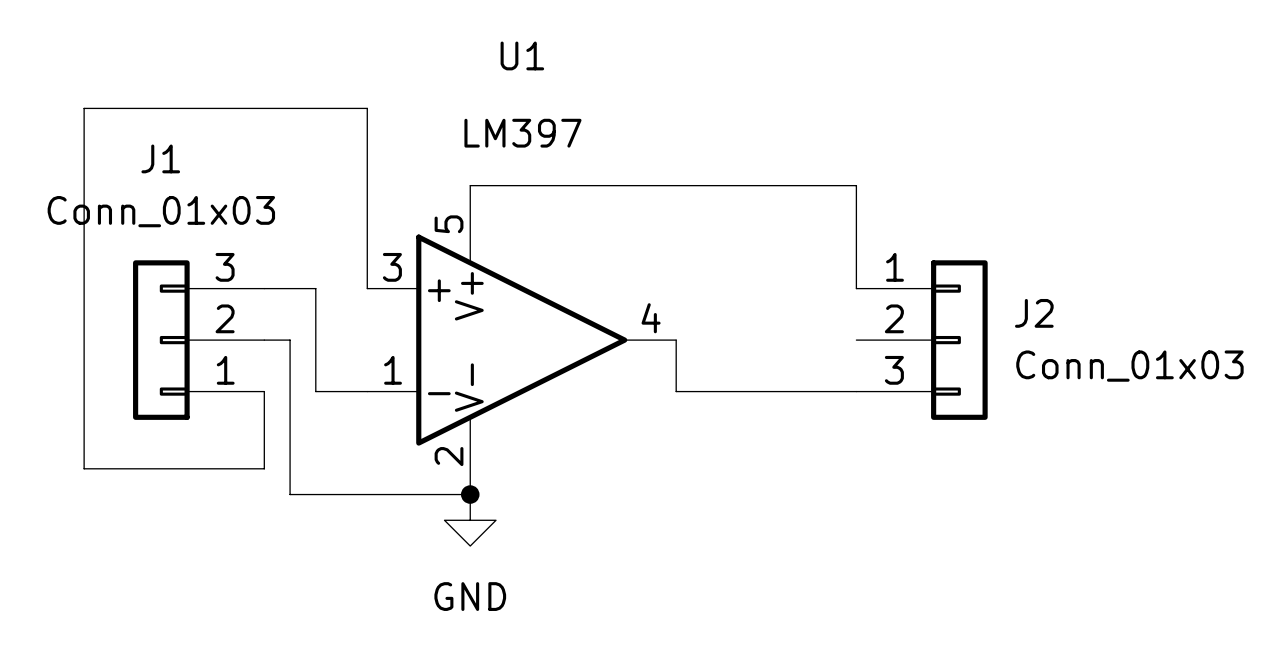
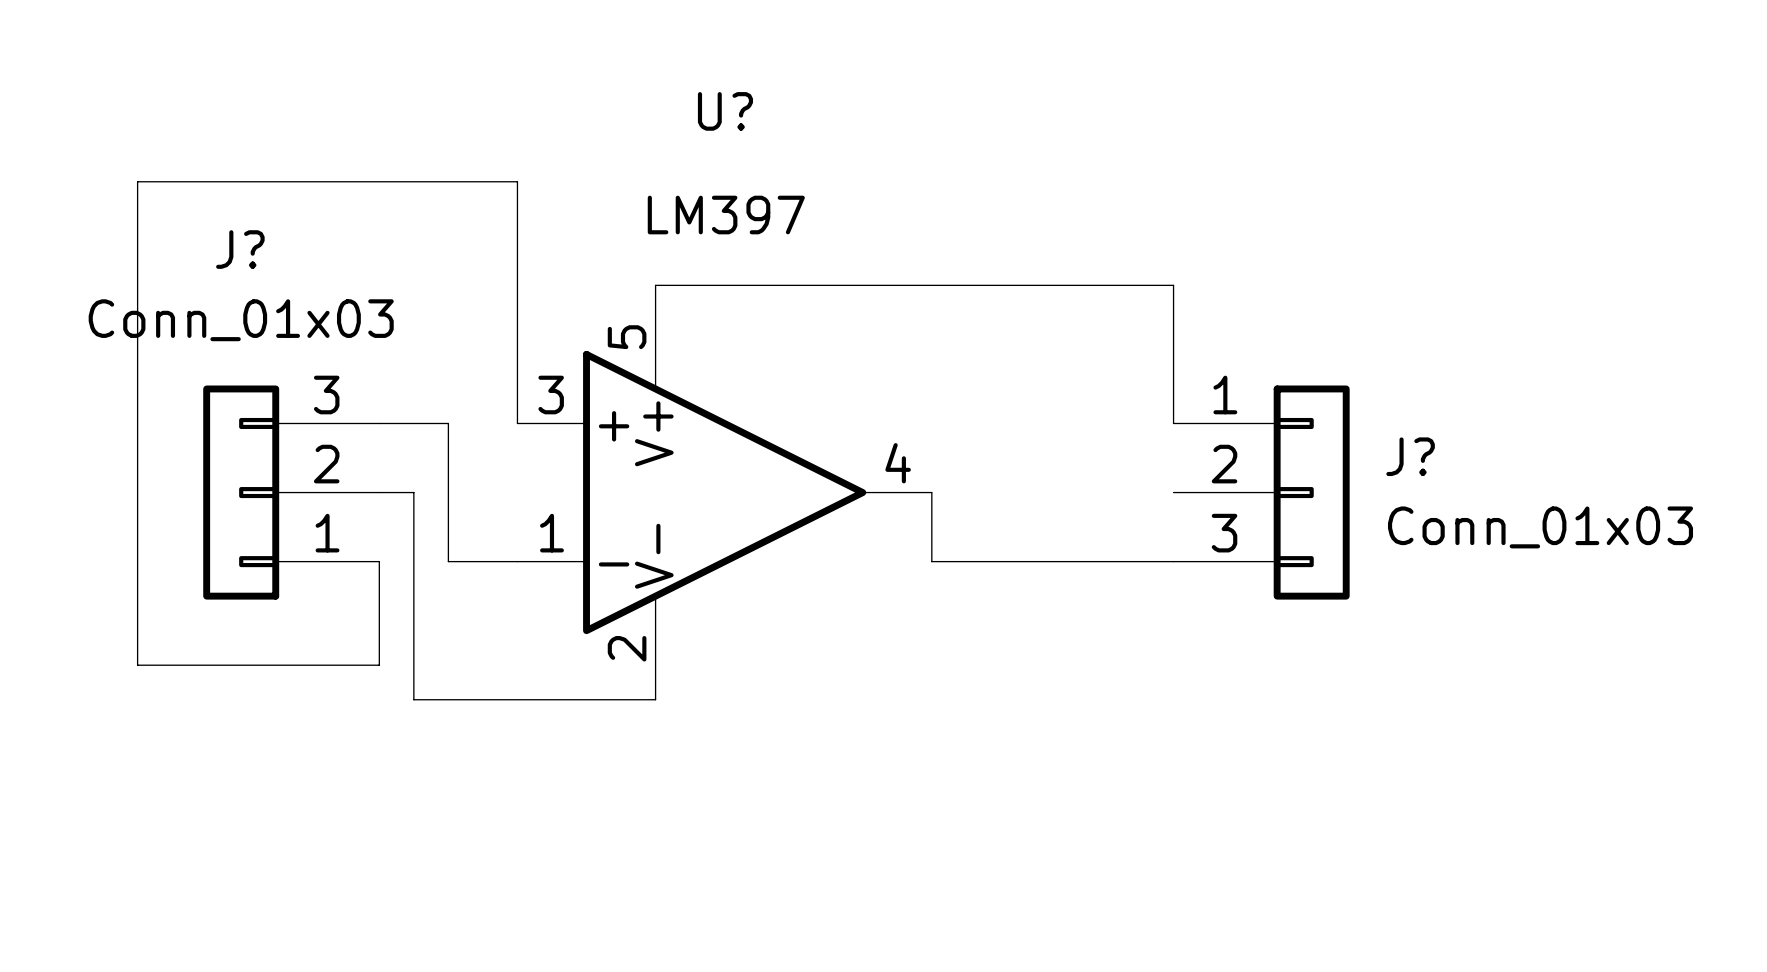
U1 name: U1 (522, 55) -> U? (725, 111)
J1 name: J1 (160, 158) -> J? (240, 249)
J2 name: J2 (1034, 313) -> J? (1410, 456)
junction: (470, 494) -> none
power symbol: GND (470, 520) -> none

